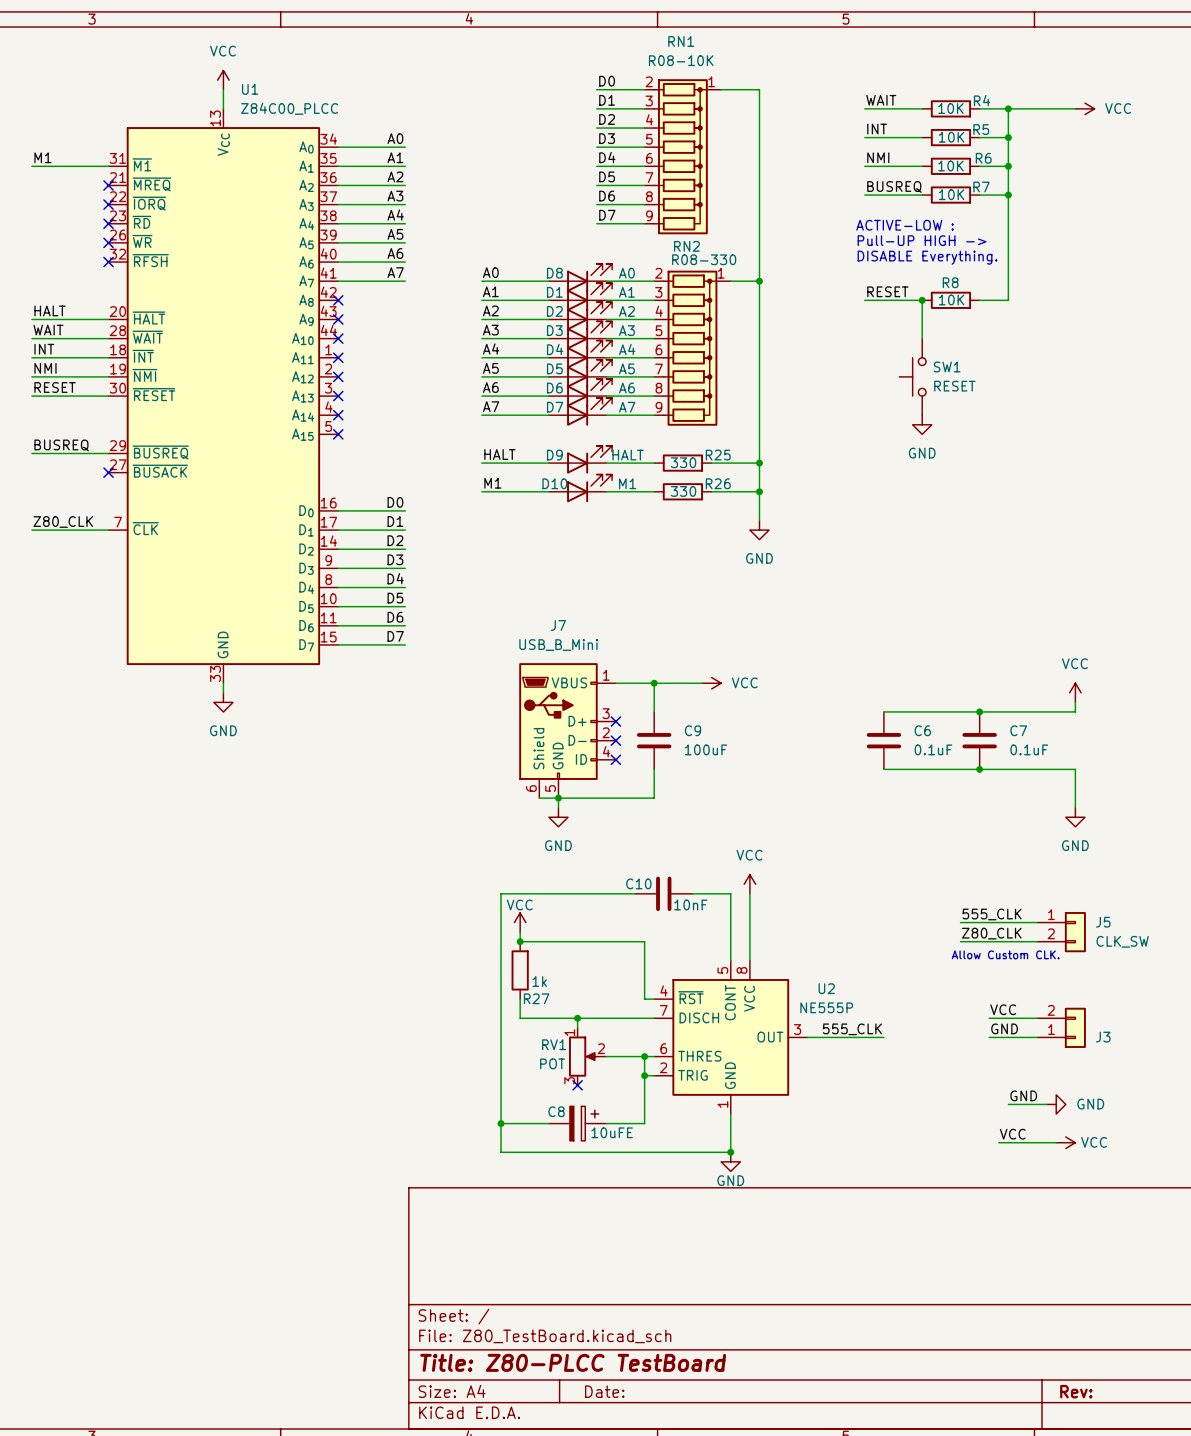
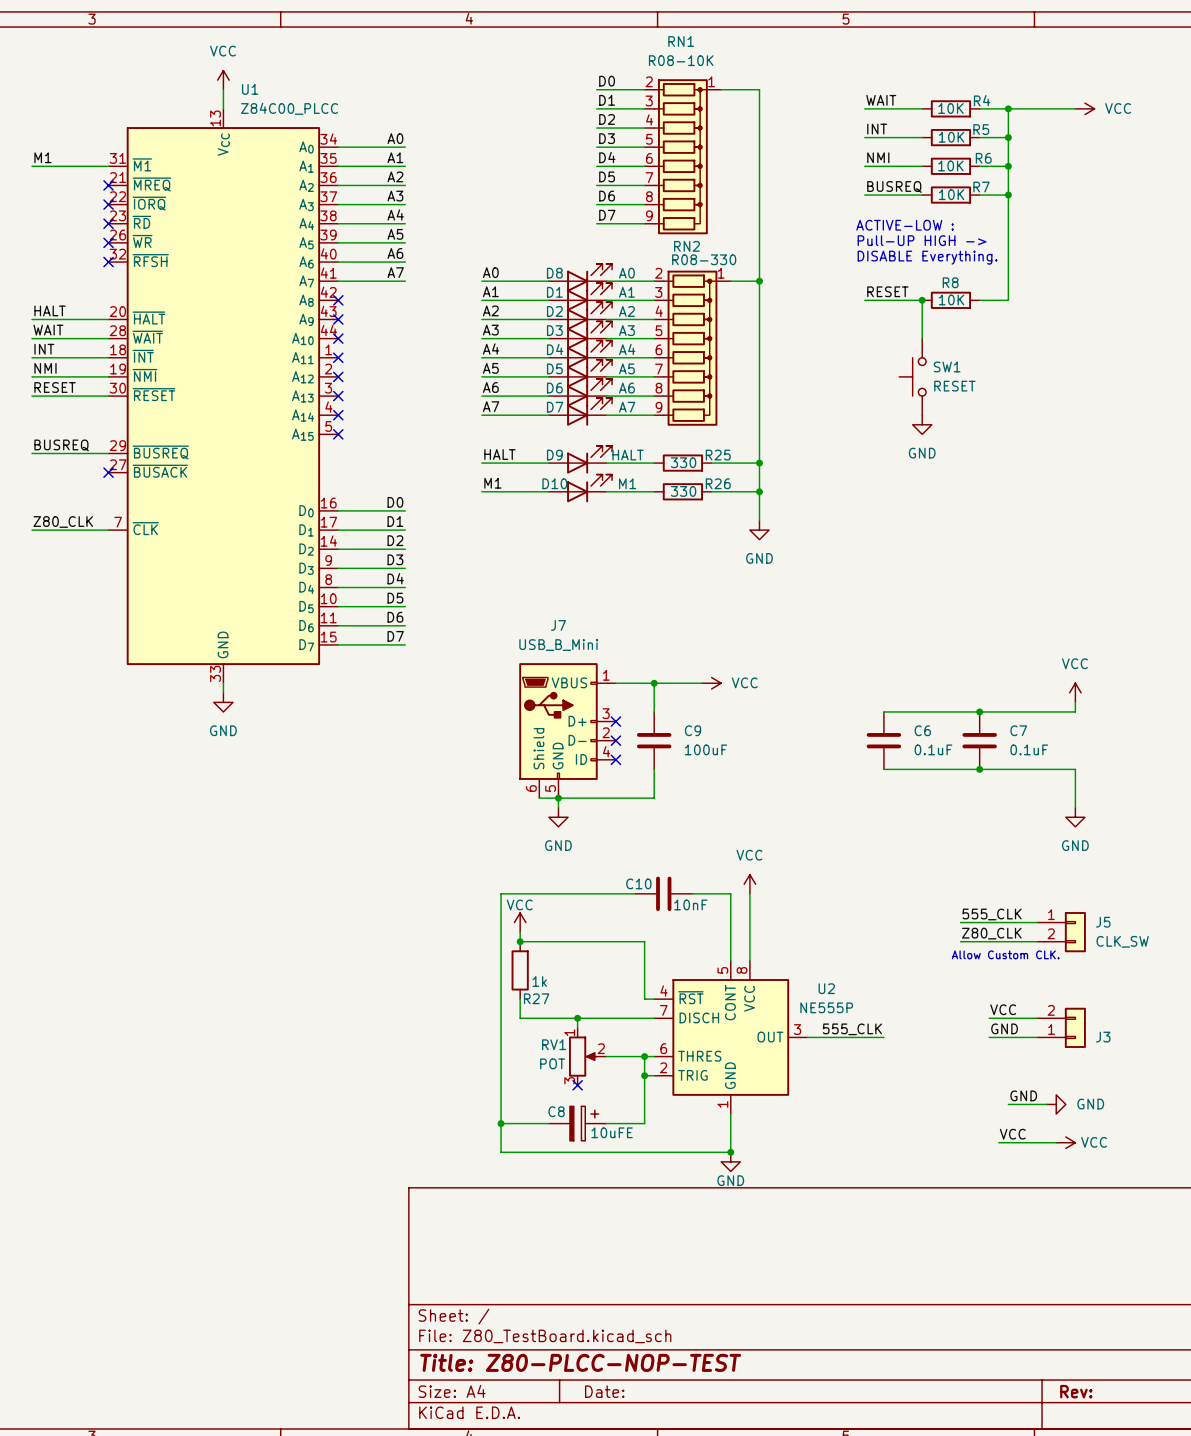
title block: Title: Z80-PLCC TestBoard (573, 1362) -> Title: Z80-PLCC-NOP-TEST (580, 1362)

